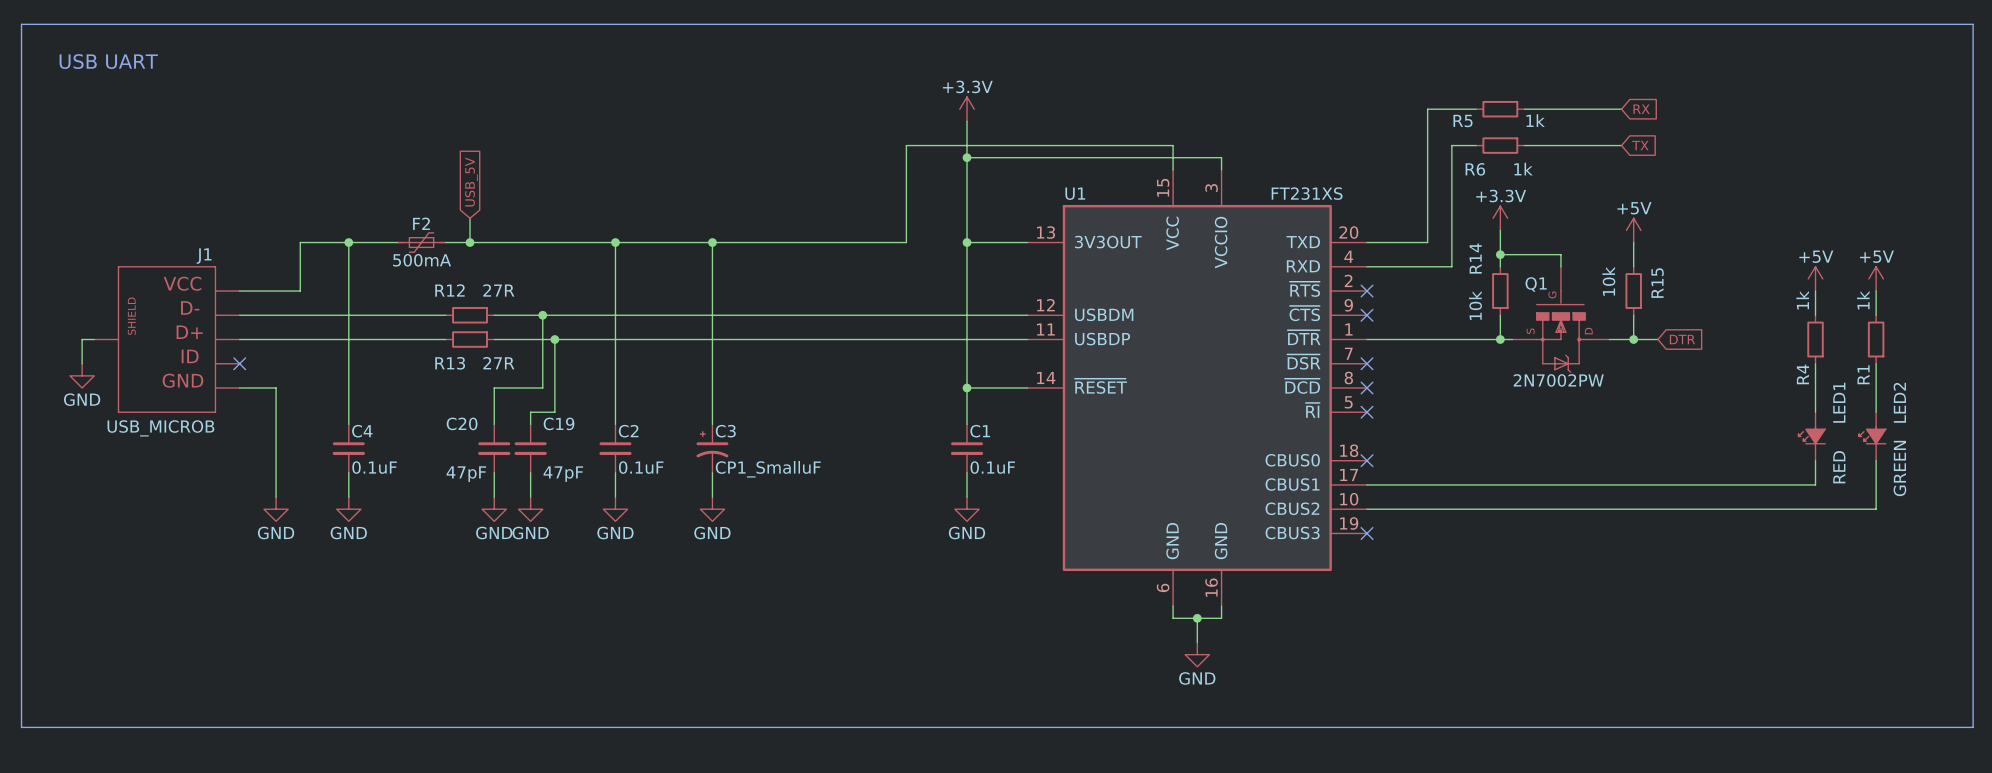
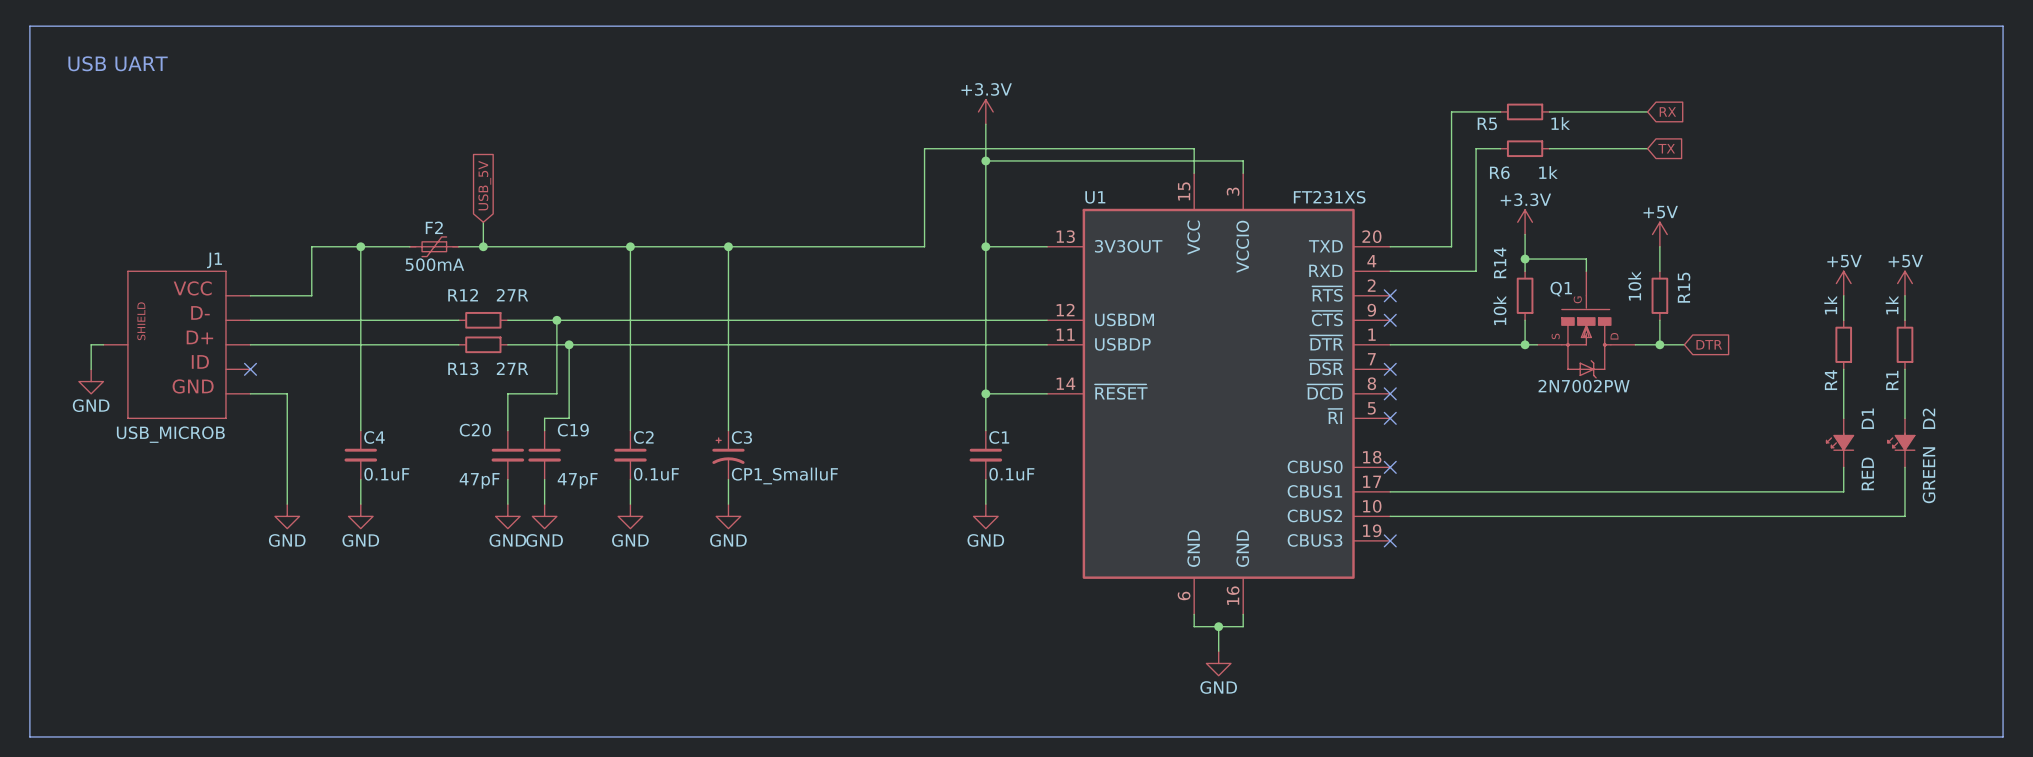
LED1 name: LED1 (1839, 402) -> D1 (1867, 418)
LED2 name: LED2 (1899, 402) -> D2 (1928, 418)

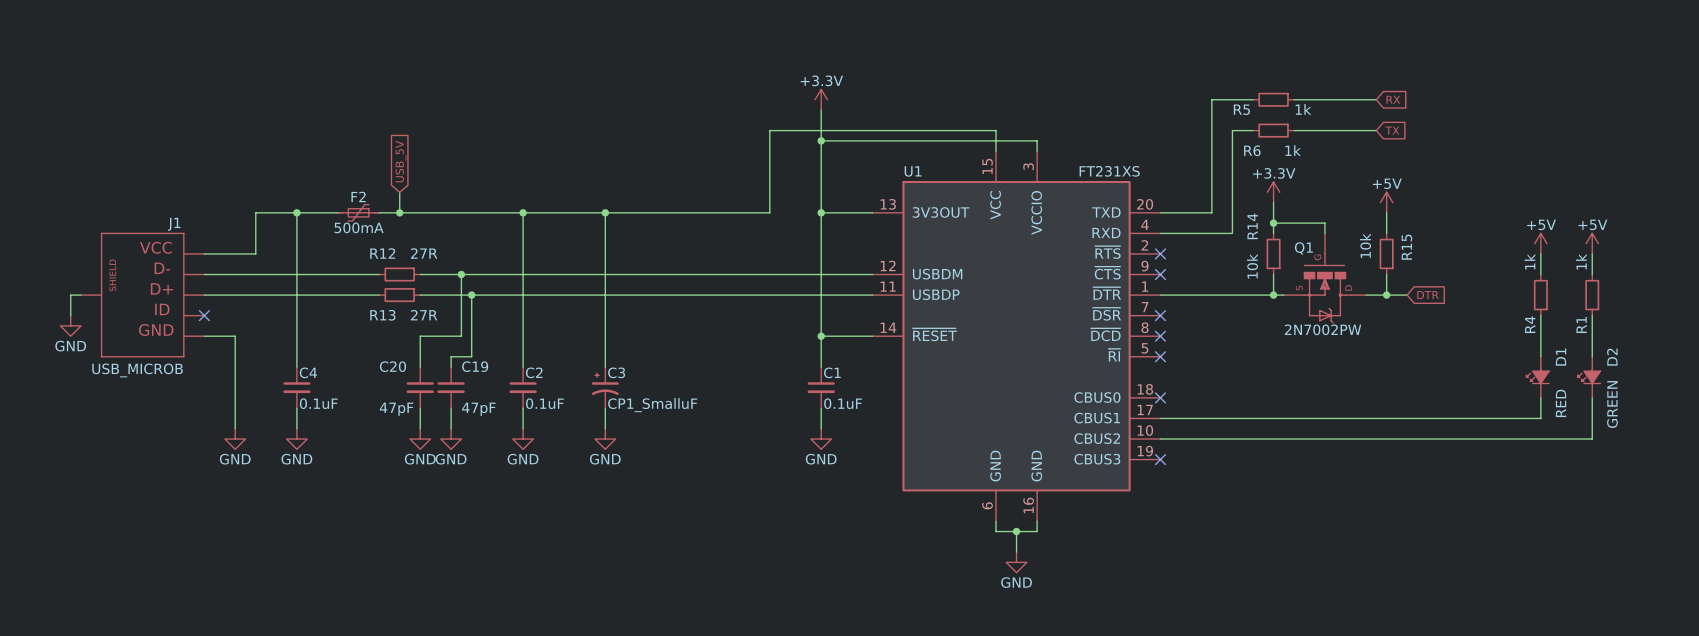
bus: (29, 26) (2003, 26) (2003, 736) (29, 736) (29, 26) -> none
text: USB UART (118, 63) -> none

